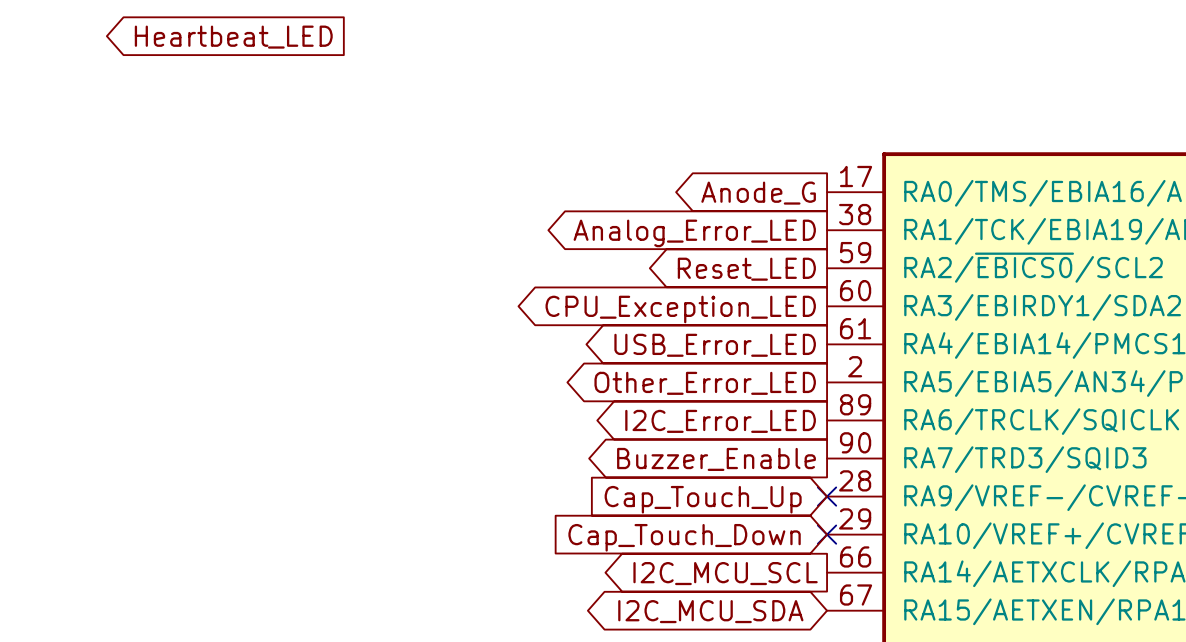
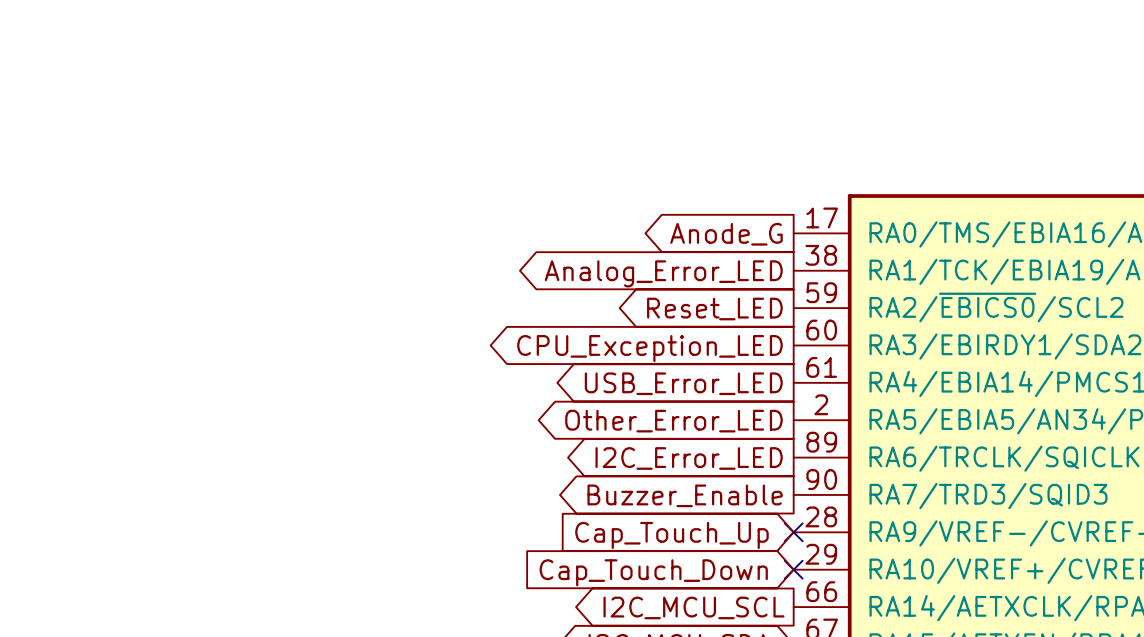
global label: Heartbeat_LED (233, 37) -> none

